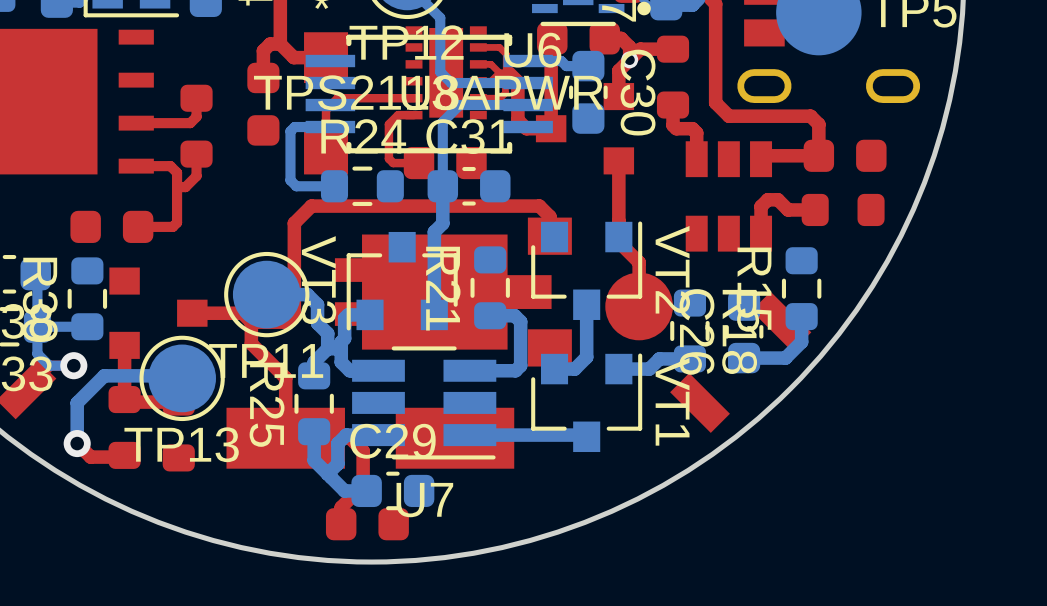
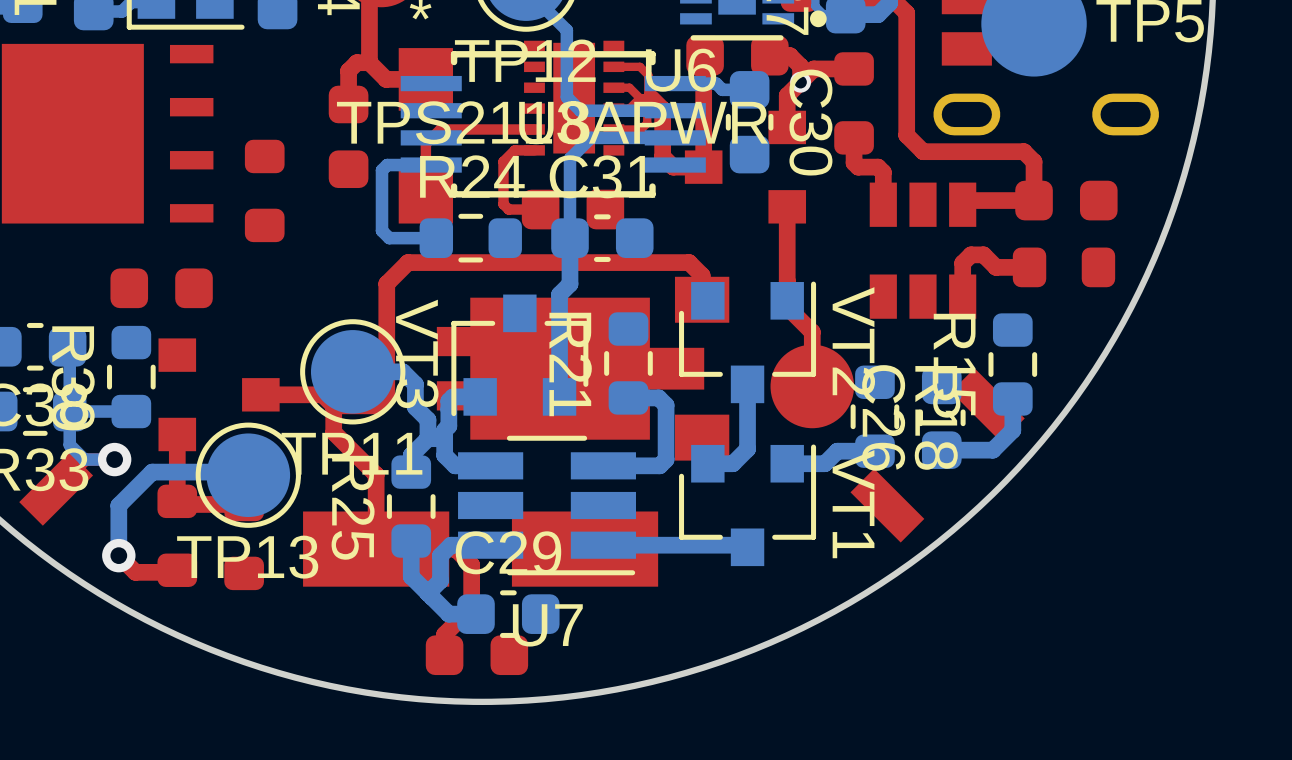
top track: (196, 98) (196, 116) (190, 123) (136, 123) -> none
part position: (196, 126) -> (264, 190)
top track: (196, 154) (196, 176) (185, 187) (177, 187) -> none
top track: (136, 166) (170, 166) (177, 172) (177, 222) (172, 226) (138, 226) -> none

